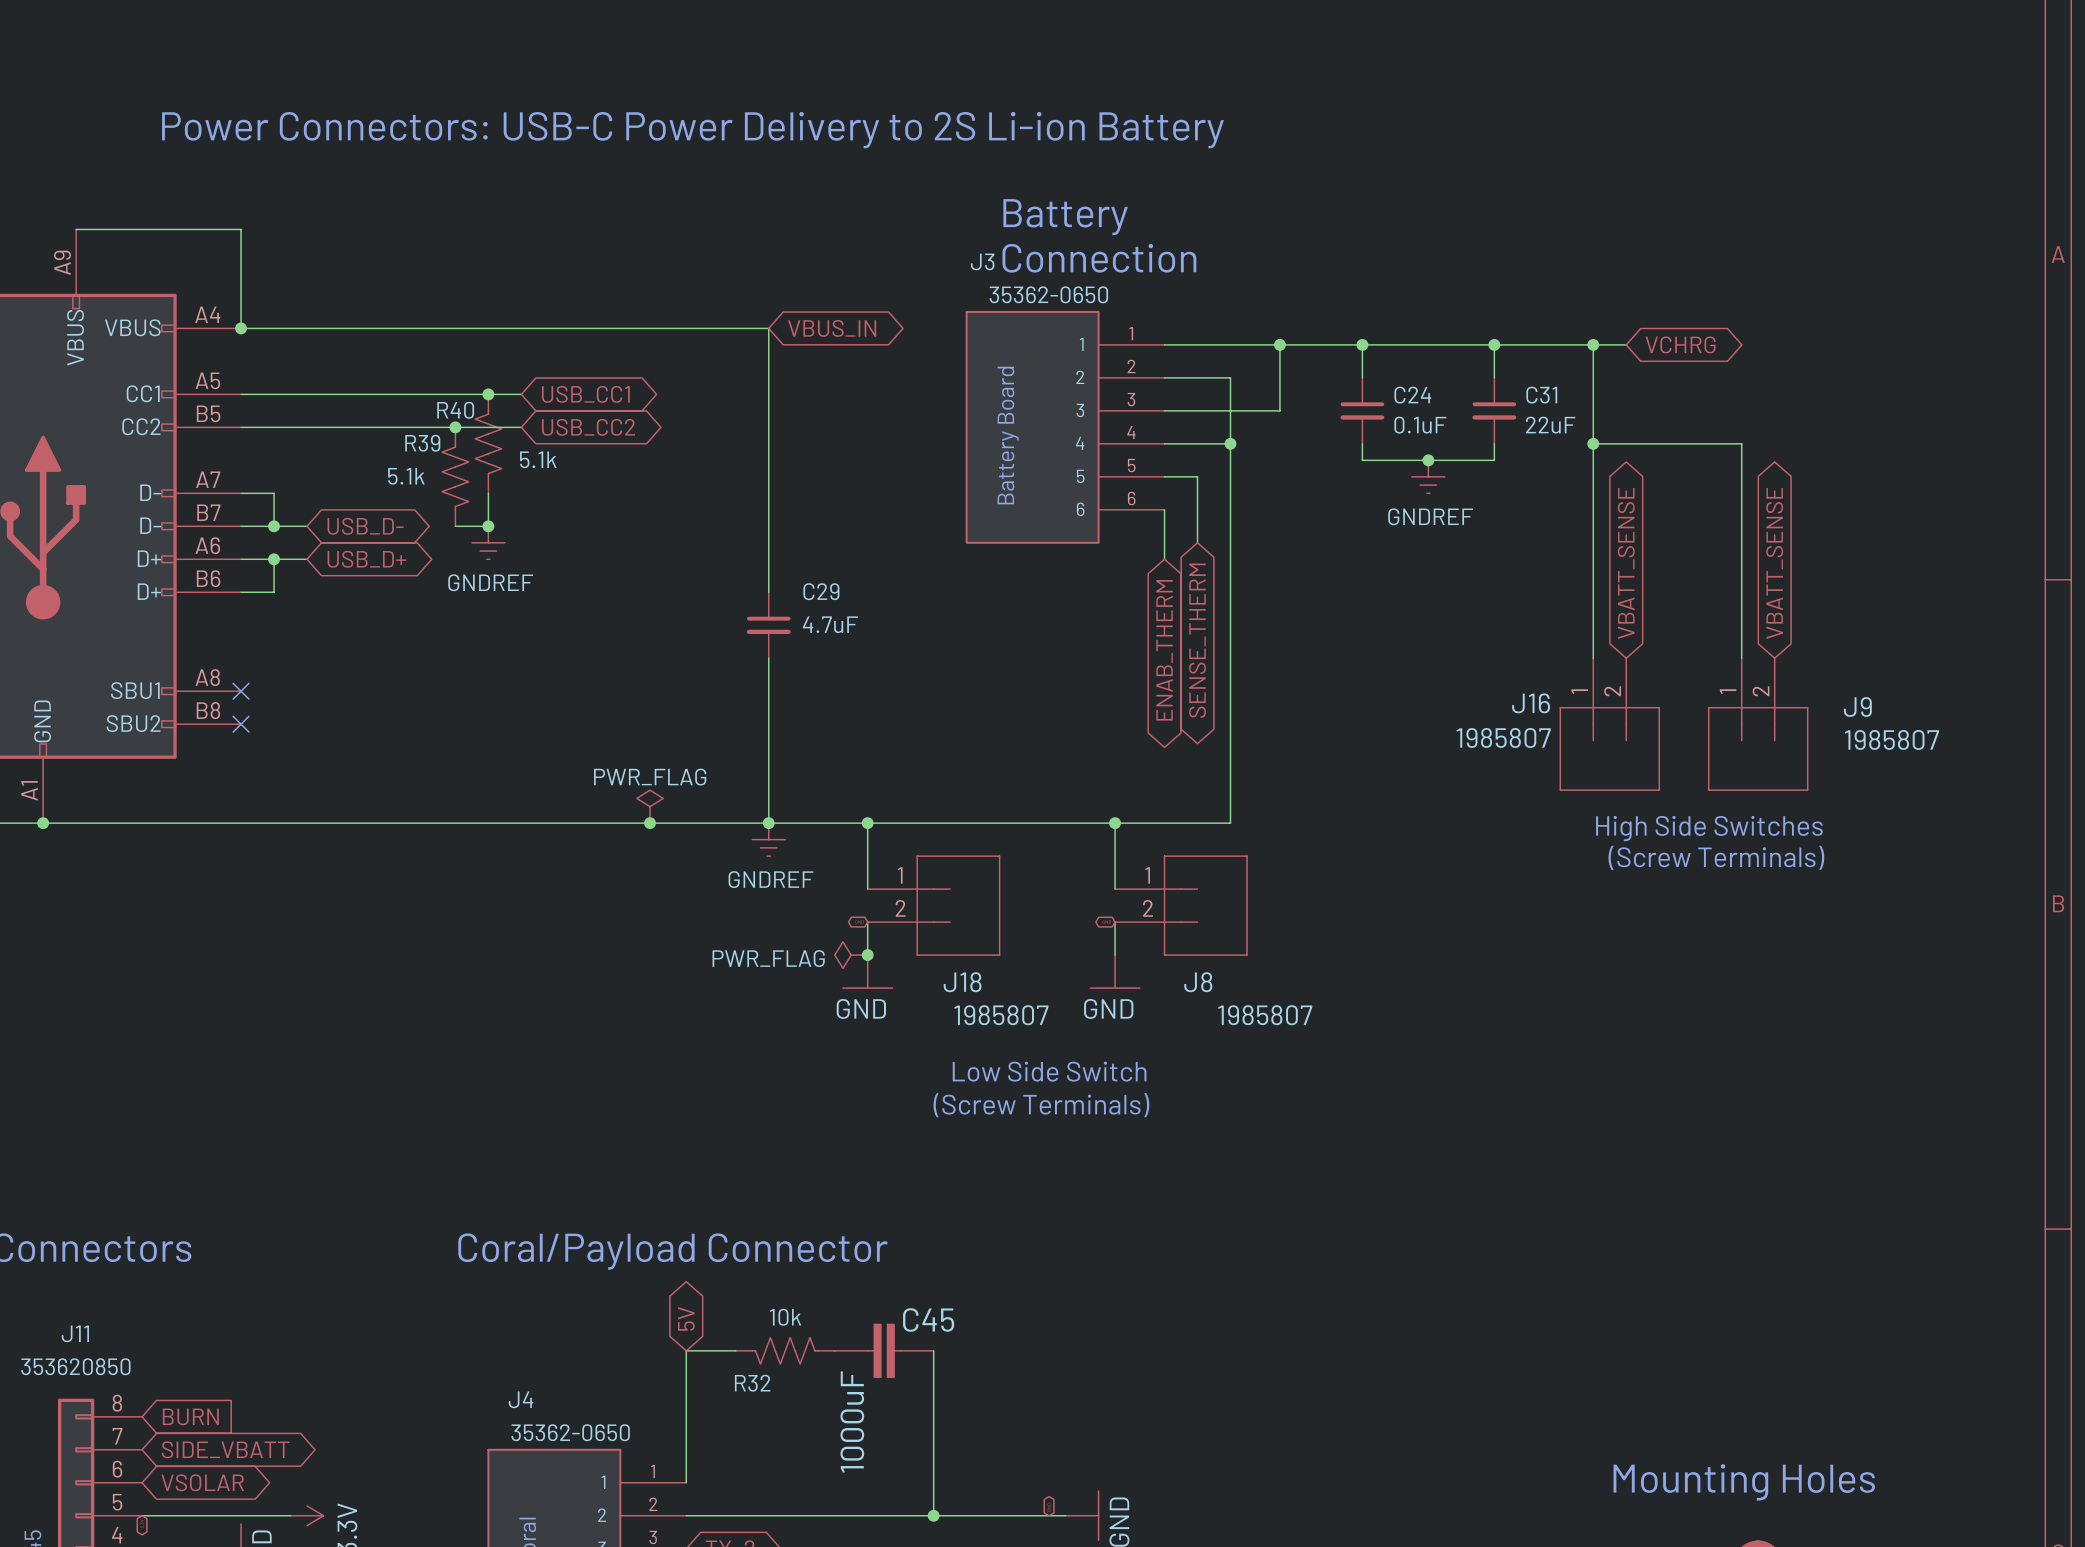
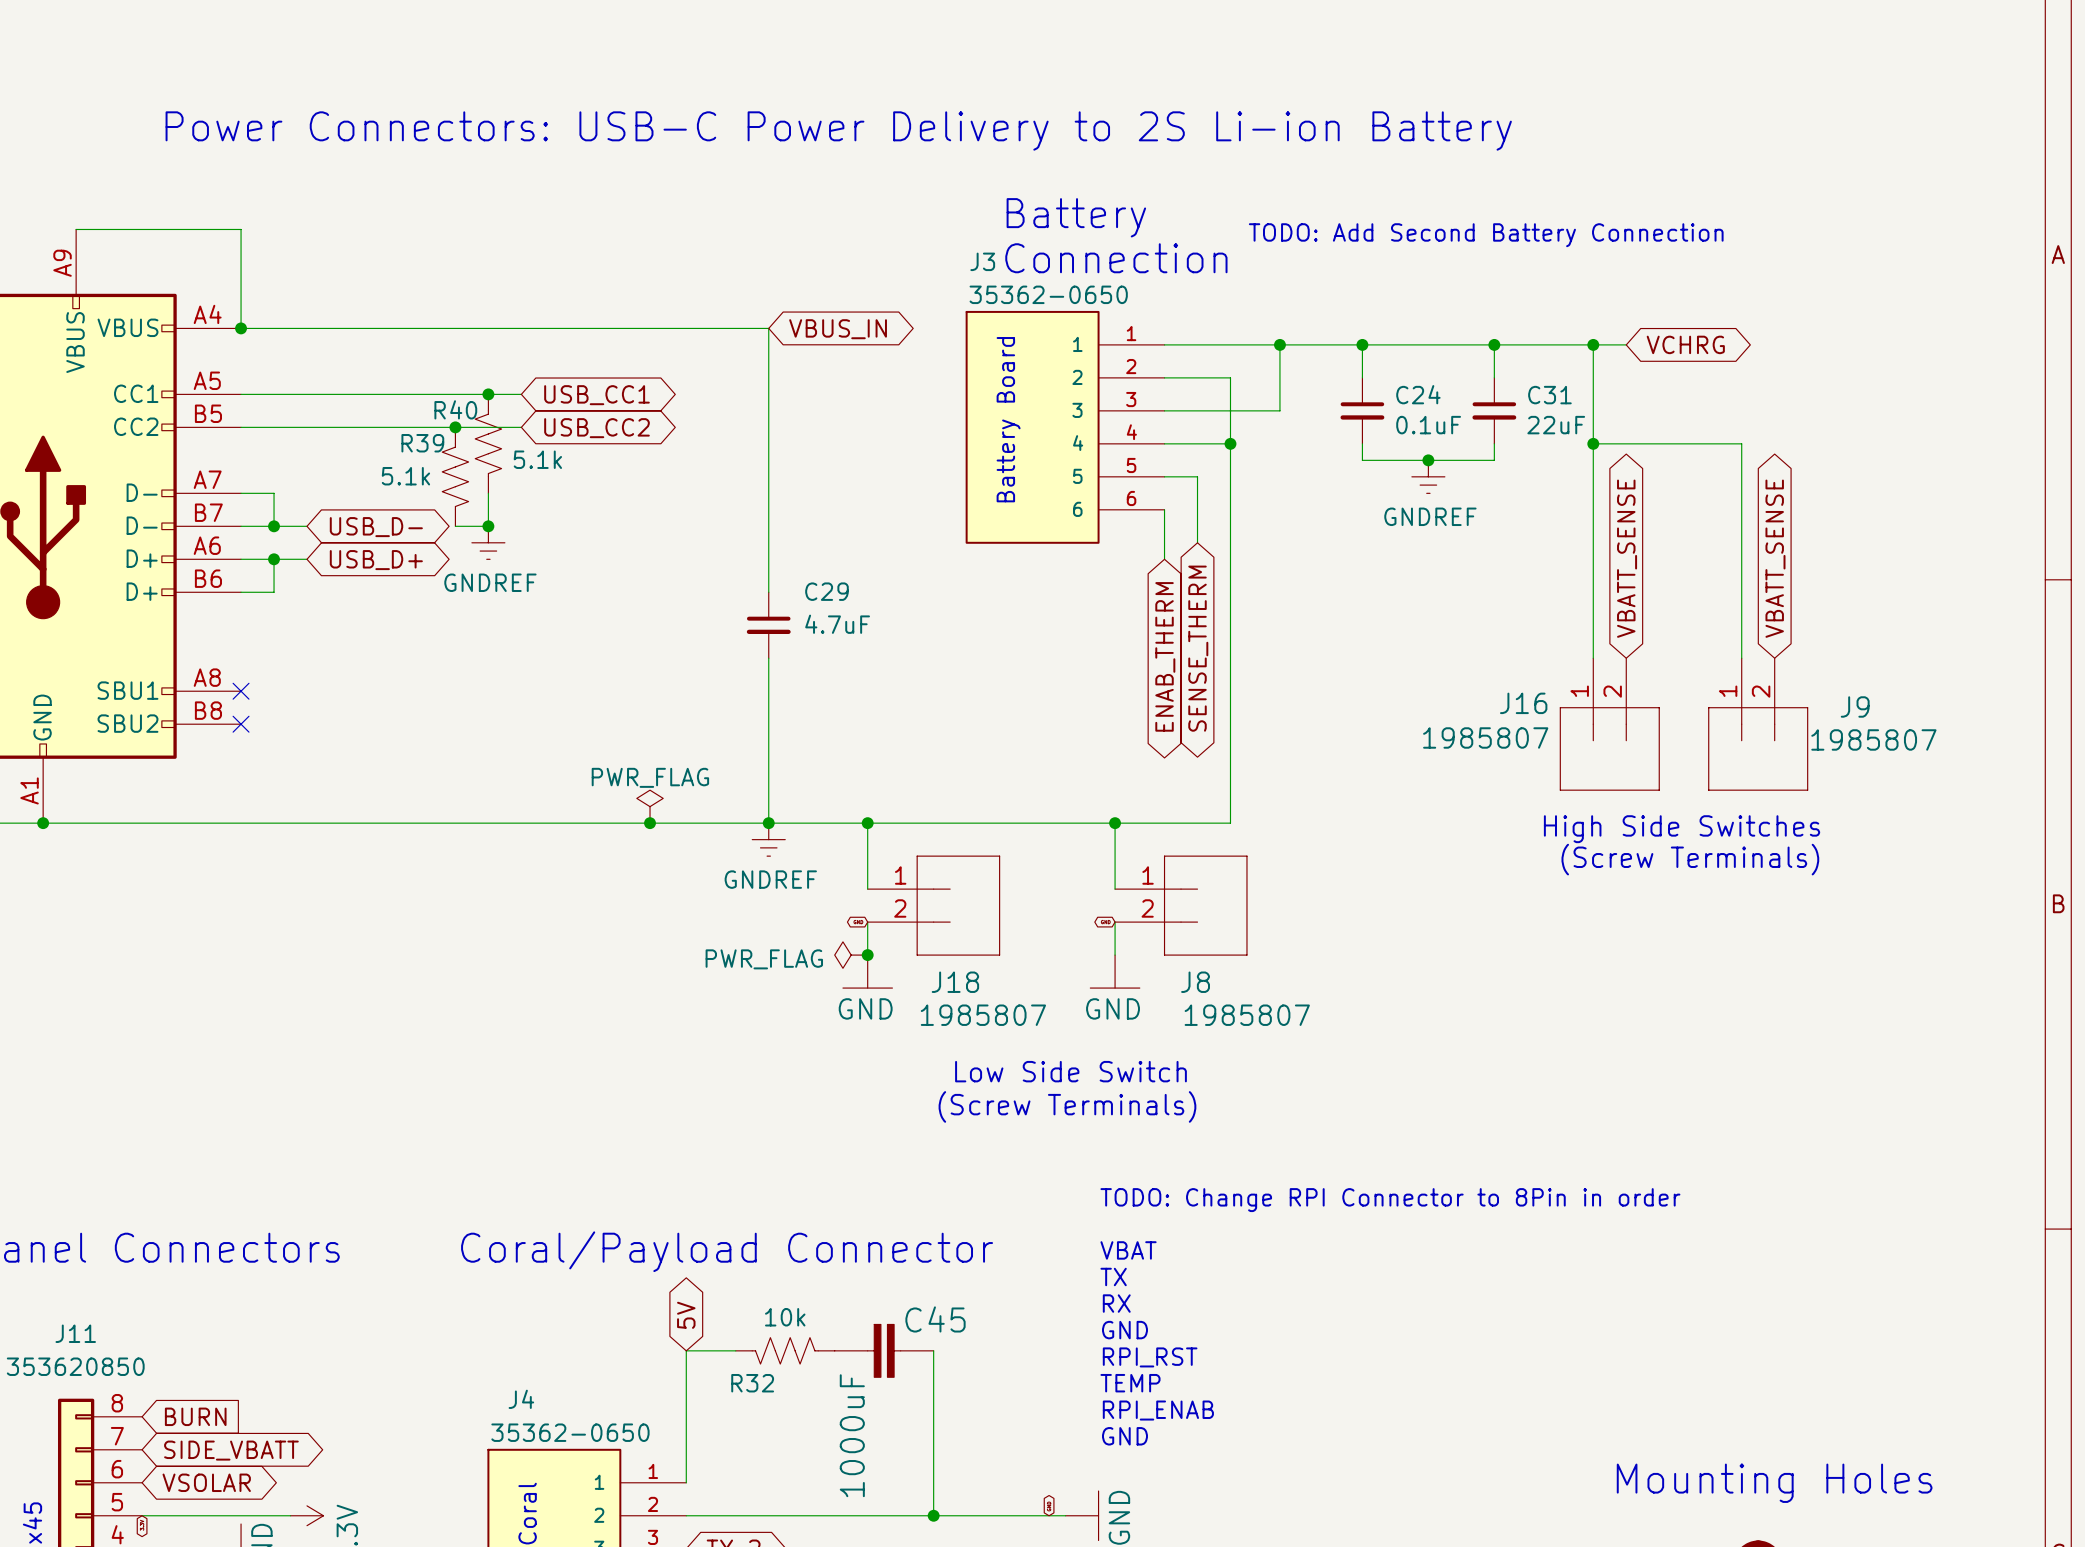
text: none -> TODO: Add Second Battery Connection (1486, 235)
text: none -> TODO: Change RPI Connector to 8Pin in order (1390, 1200)
text: none -> VBAT (1128, 1250)
text: none -> TX (1113, 1276)
text: none -> RX (1116, 1303)
text: none -> GND (1124, 1330)
text: none -> RPI_RST (1150, 1357)
text: none -> TEMP (1130, 1383)
text: none -> RPI_ENAB (1158, 1410)
text: none -> GND (1124, 1436)

